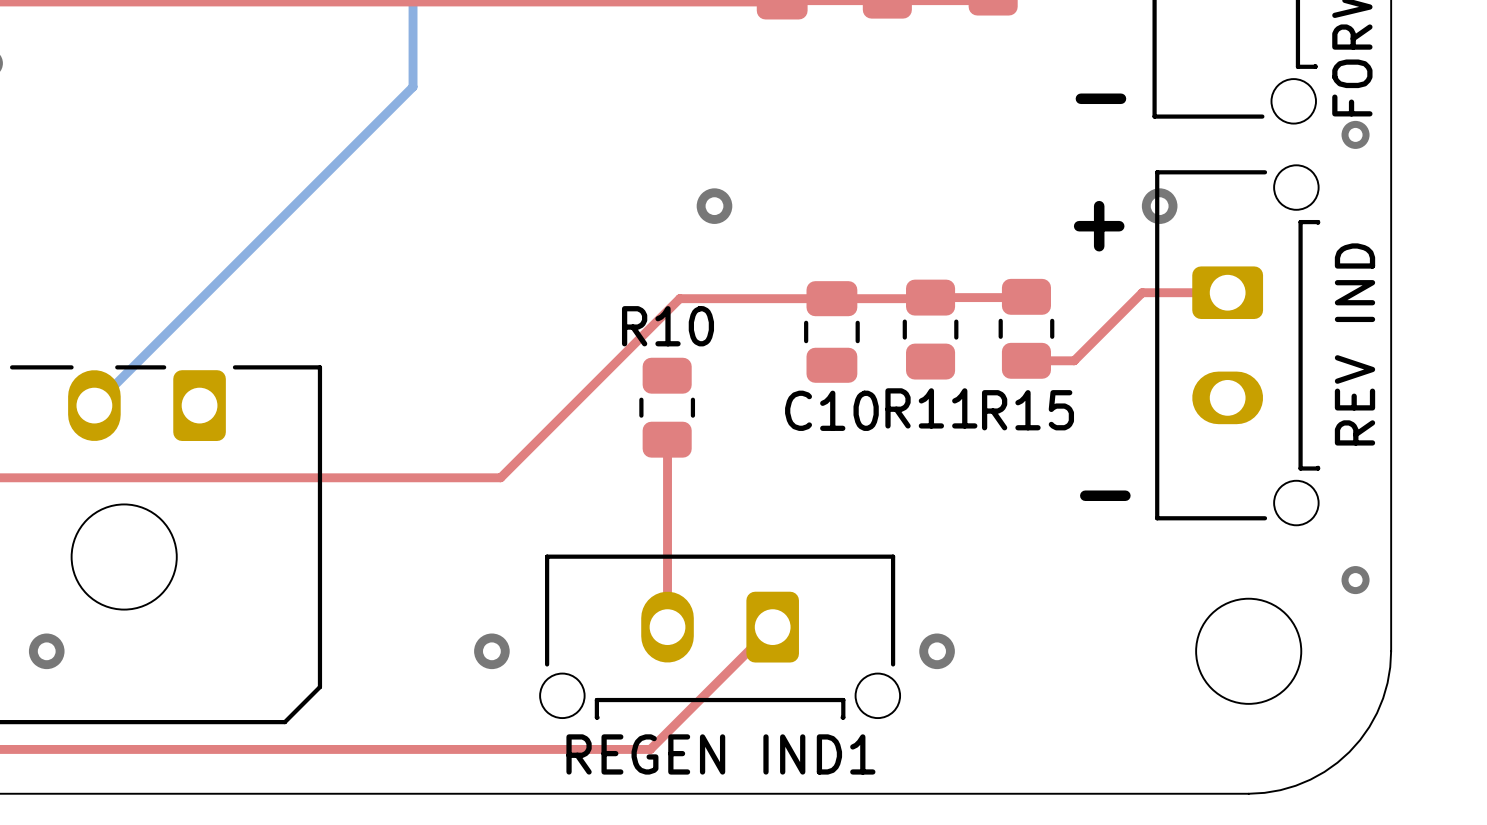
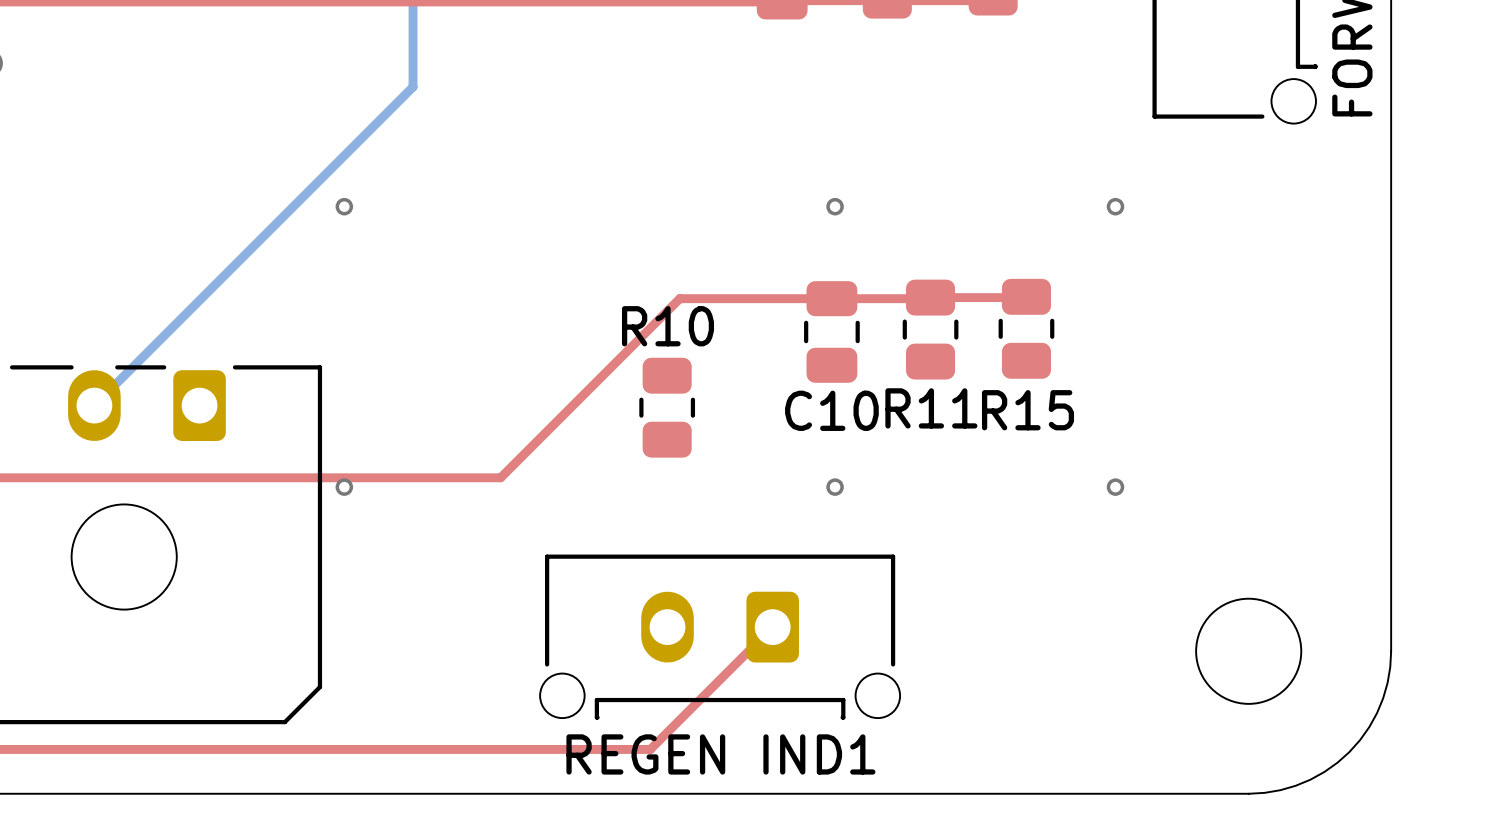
text: _ (1100, 98) -> none
via: (1355, 134) -> none
via: none -> (344, 206)
via: (714, 206) -> none
via: none -> (835, 206)
via: none -> (1115, 206)
via: (1159, 206) -> none
text: + (1099, 226) -> none
top track: (1227, 292) (1142, 292) (1074, 360) (1026, 360) -> none
REV IND: (1237, 345) -> none
top track: (667, 440) (667, 627) -> none
via: none -> (344, 487)
via: none -> (835, 487)
via: none -> (1115, 487)
text: _ (1105, 495) -> none
via: (1355, 580) -> none
via: (46, 651) -> none
via: (491, 651) -> none
via: (937, 651) -> none

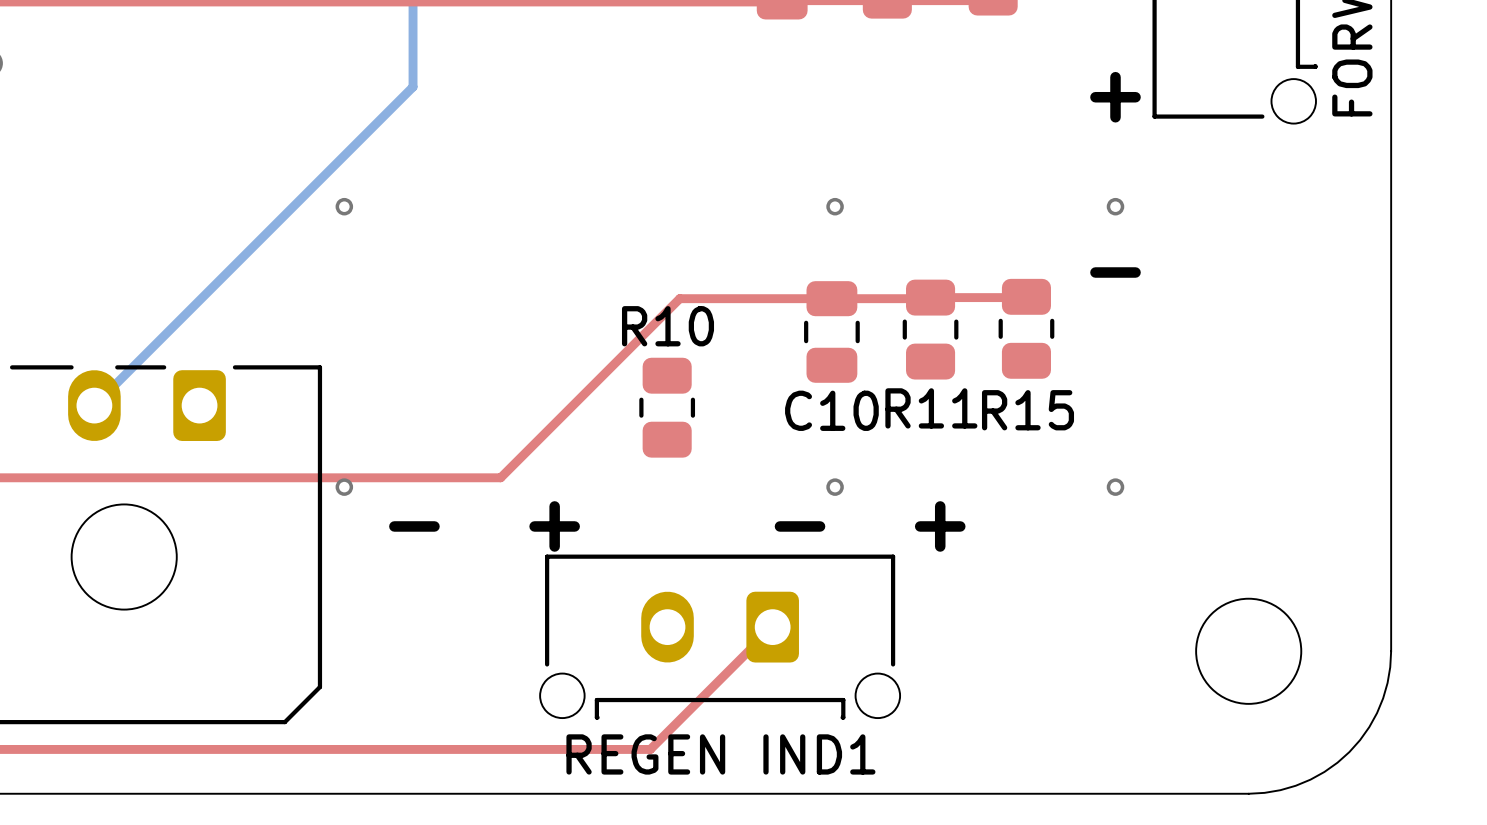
text: none -> + (1115, 97)
text: none -> - (1115, 272)
text: none -> - (414, 526)
text: none -> + (554, 526)
text: none -> - (800, 526)
text: none -> + (940, 526)

